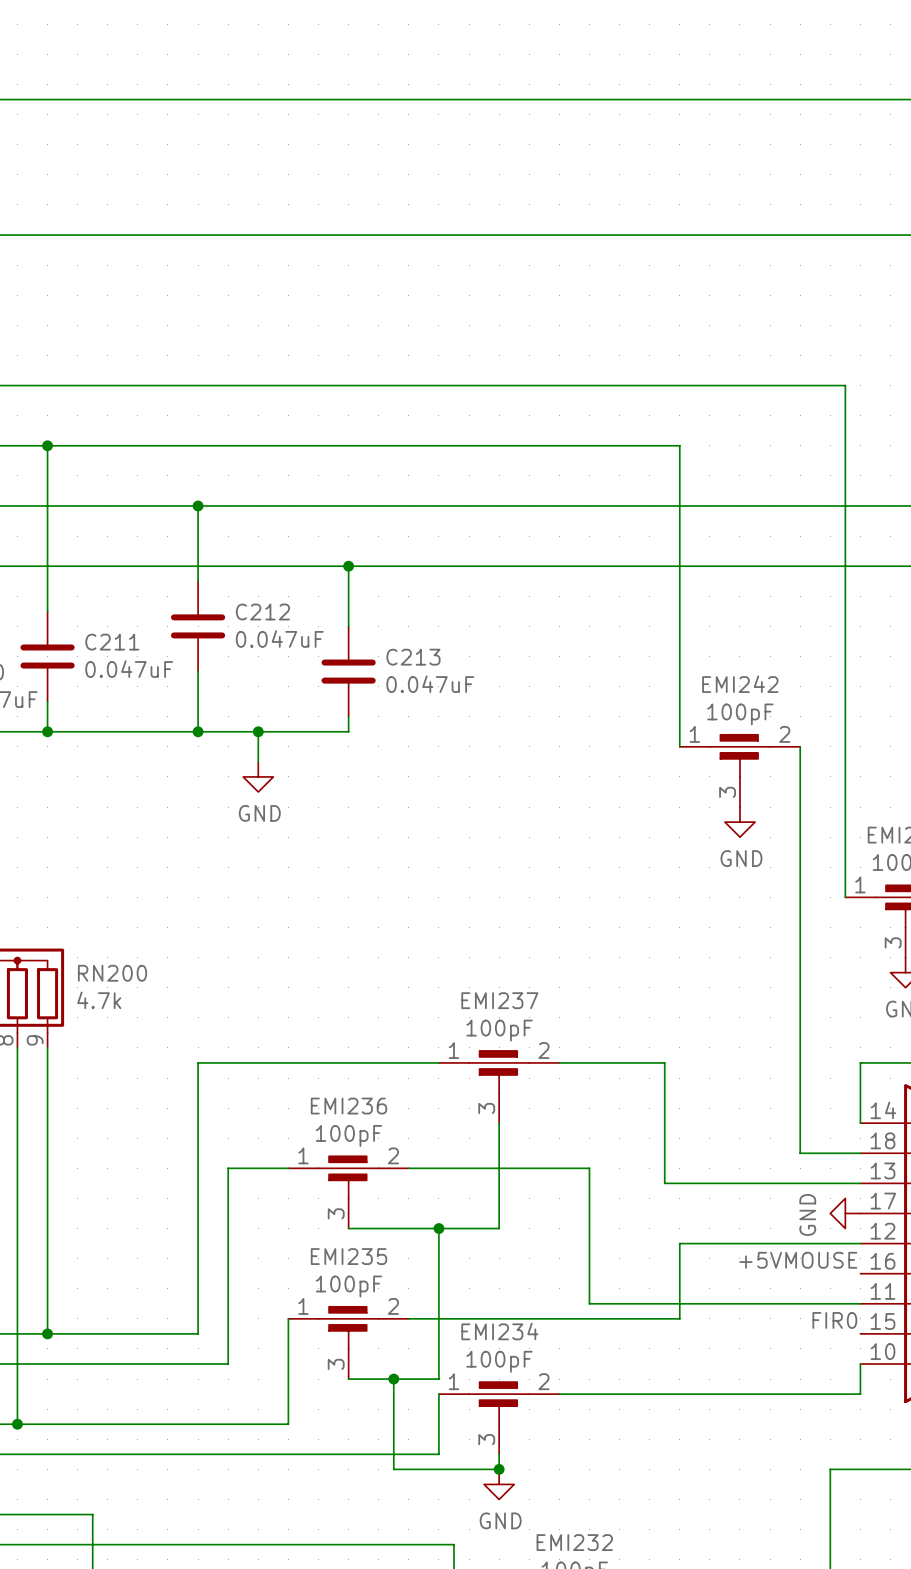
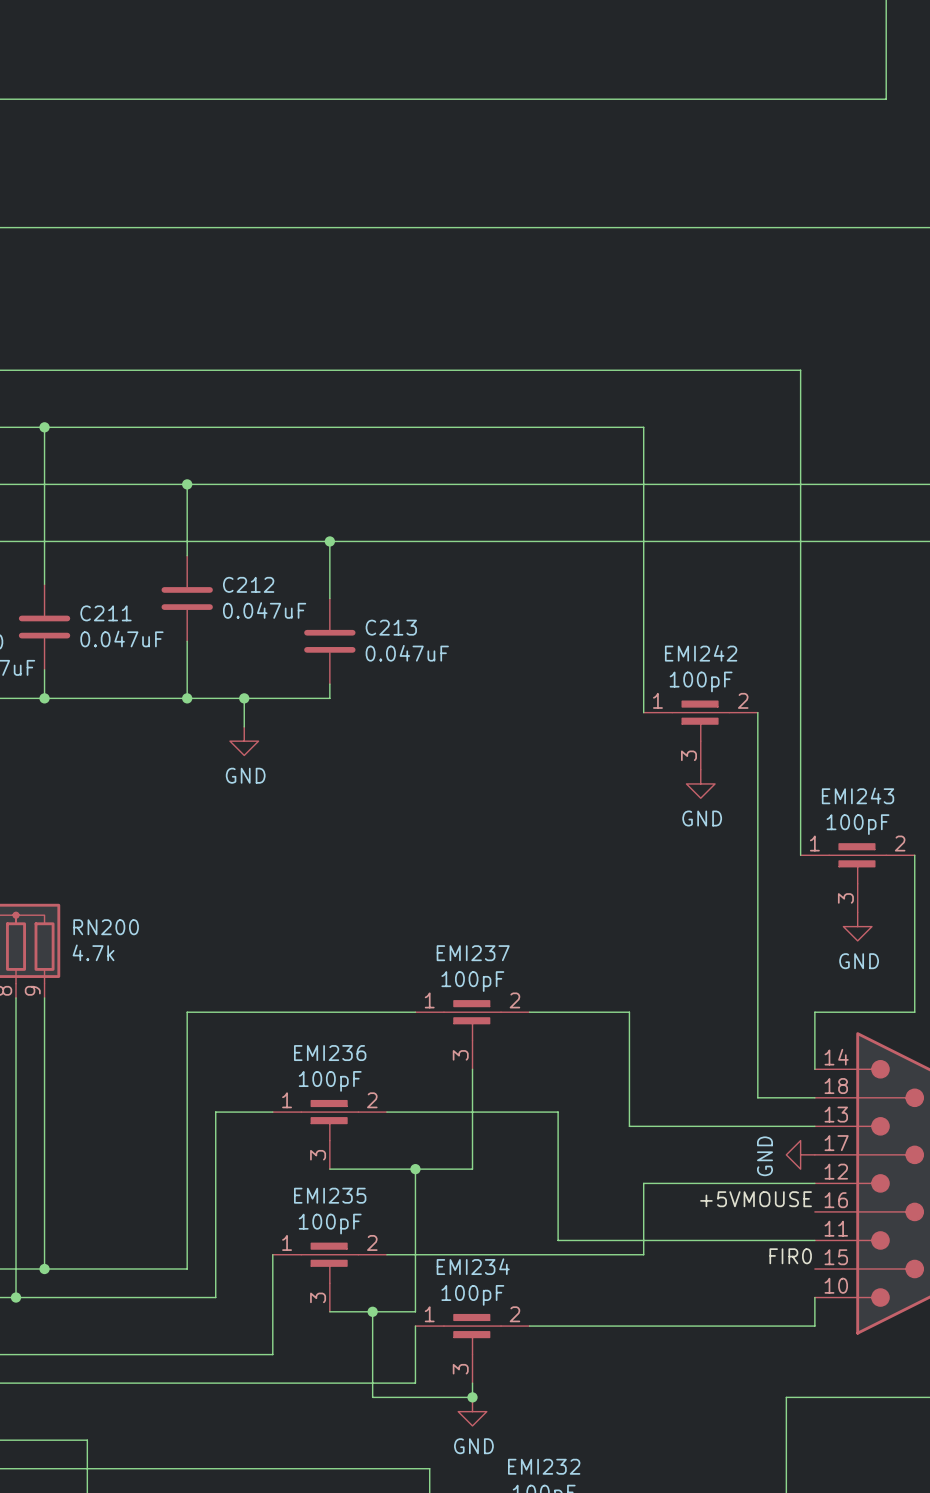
wire: (17, 1364) (17, 1424) -> none
junction: none -> (16, 1297)
junction: (17, 1424) -> none

